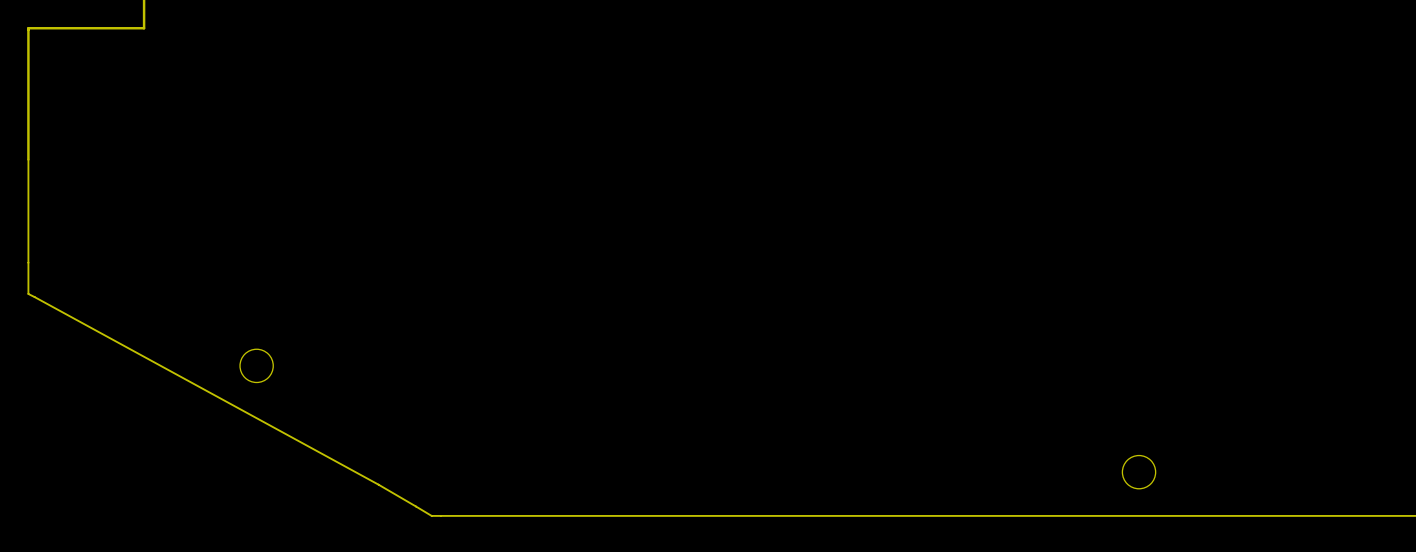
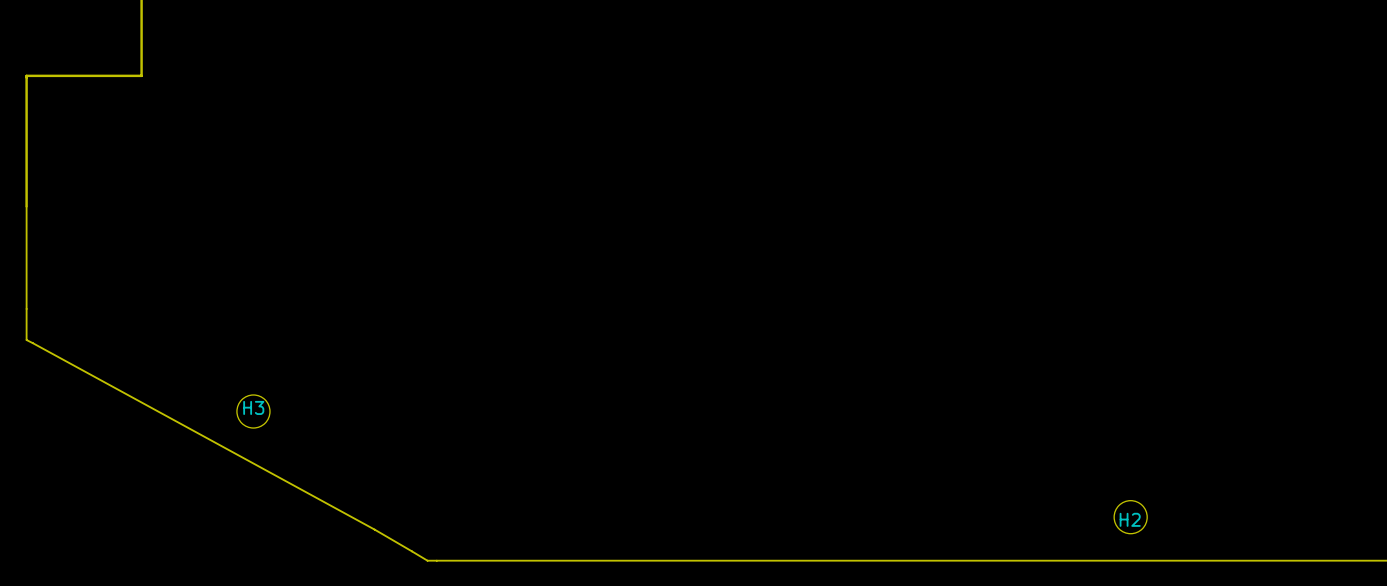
H3 name: none -> H3 (253, 407)
H2 name: none -> H2 (1130, 519)

